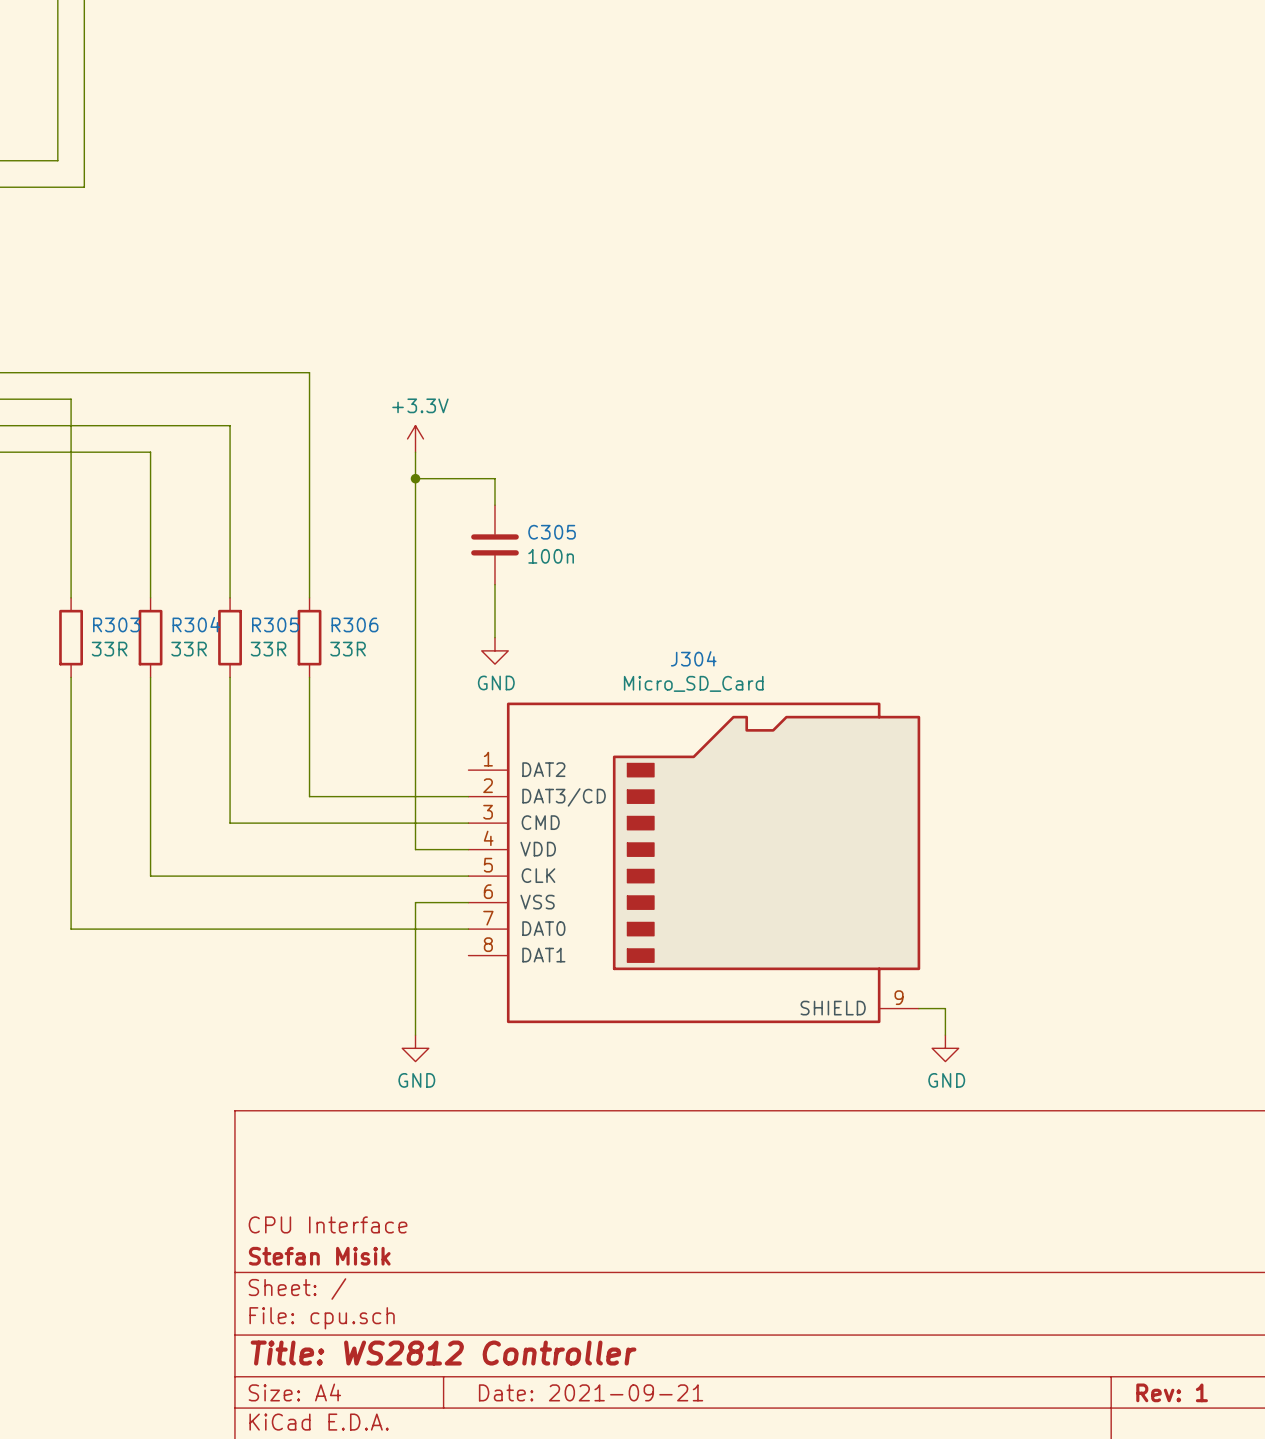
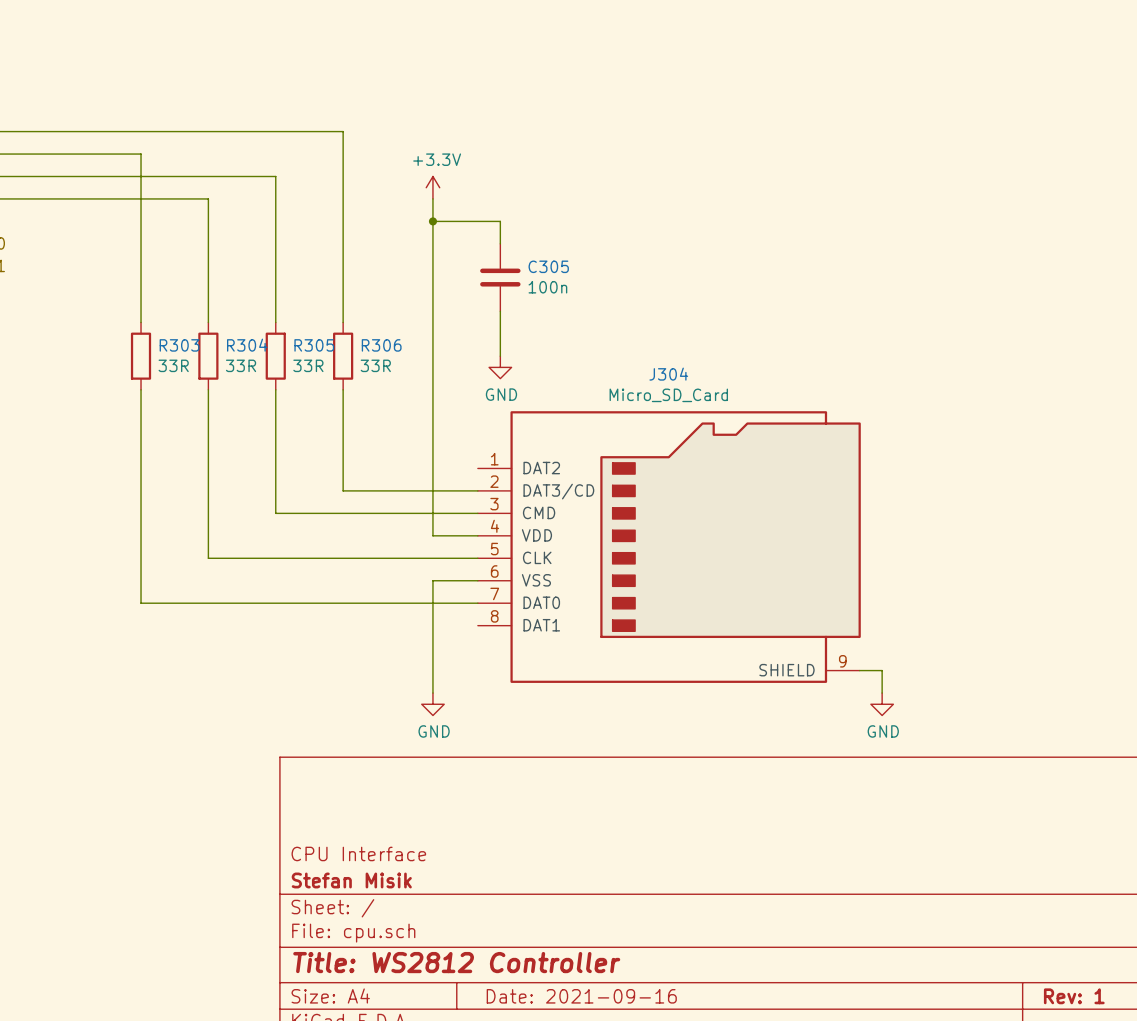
title block: Date: 2021-09-21 (591, 1392) -> Date: 2021-09-16 (581, 996)

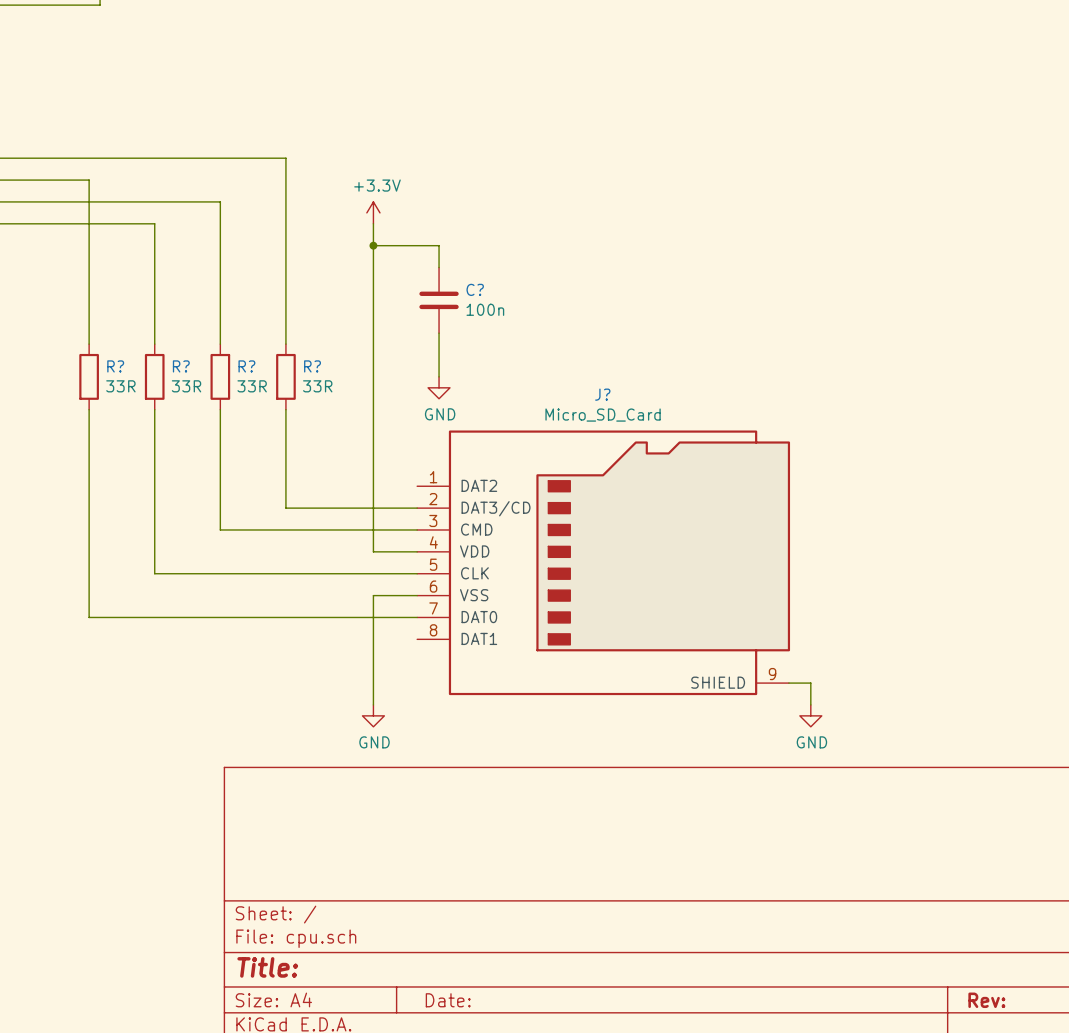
C305 name: C305 (548, 266) -> C? (475, 289)
R303 name: R303 (179, 345) -> R? (115, 366)
R304 name: R304 (247, 345) -> R? (181, 366)
R305 name: R305 (314, 345) -> R? (246, 366)
R306 name: R306 (381, 345) -> R? (312, 366)
J304 name: J304 (668, 374) -> J? (602, 394)
title block: CPU Interface (358, 853) -> none
title block: Stefan Misik (351, 880) -> none
title block: Title: WS2812 Controller (456, 962) -> Title: (267, 967)
title block: Date: 2021-09-16 (581, 996) -> Date: (448, 1000)
title block: Rev: 1 (1074, 996) -> Rev: (986, 1000)

